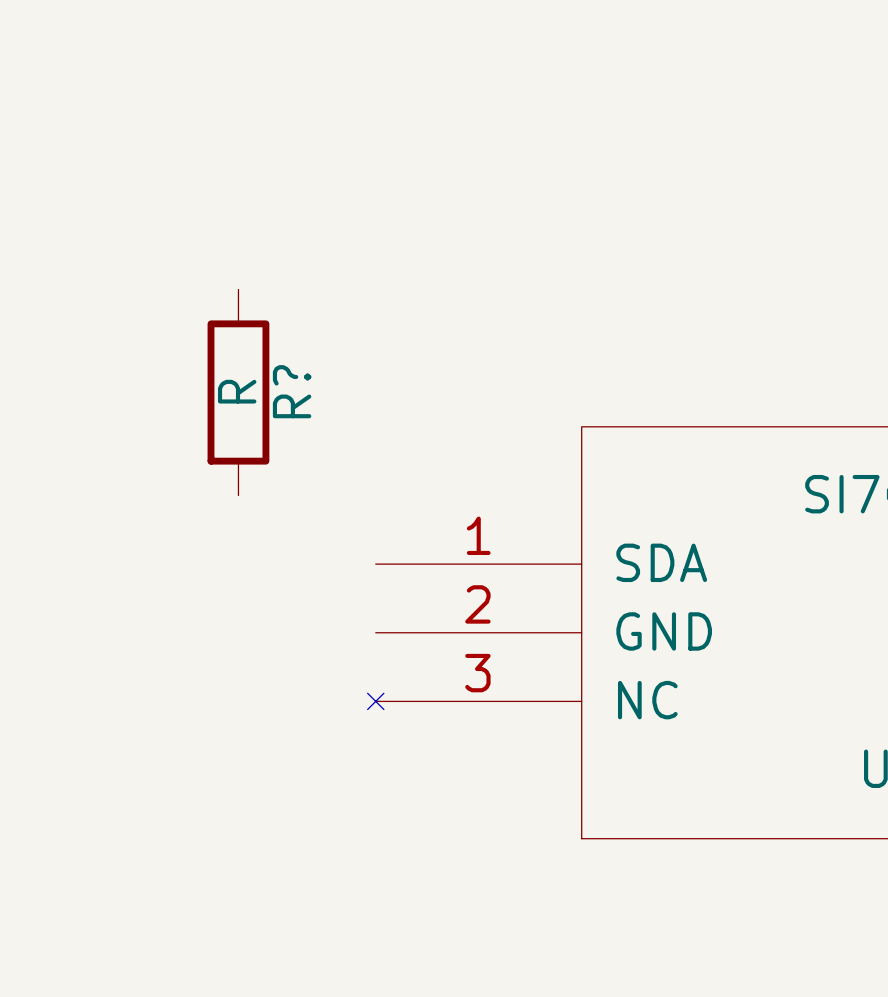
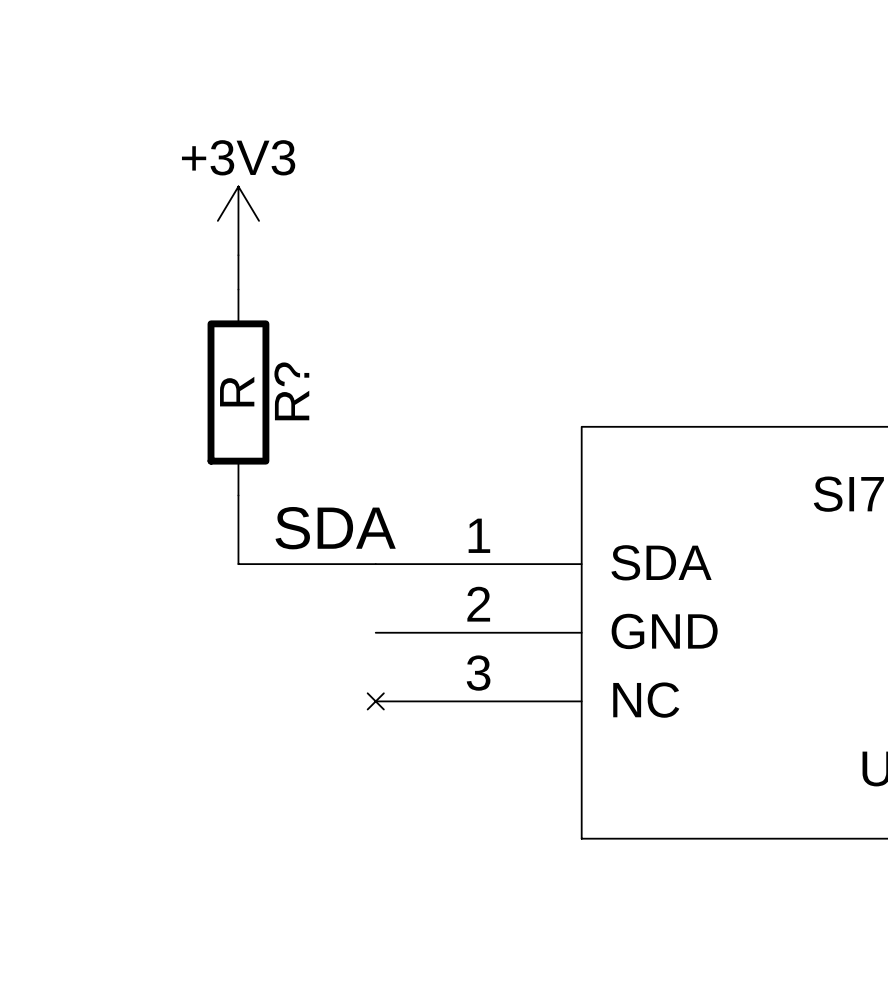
power symbol: none -> +3V3 (238, 220)
wire: none -> (238, 255) (238, 289)
wire: none -> (238, 495) (238, 564) (375, 564)
label: none -> SDA (335, 528)

